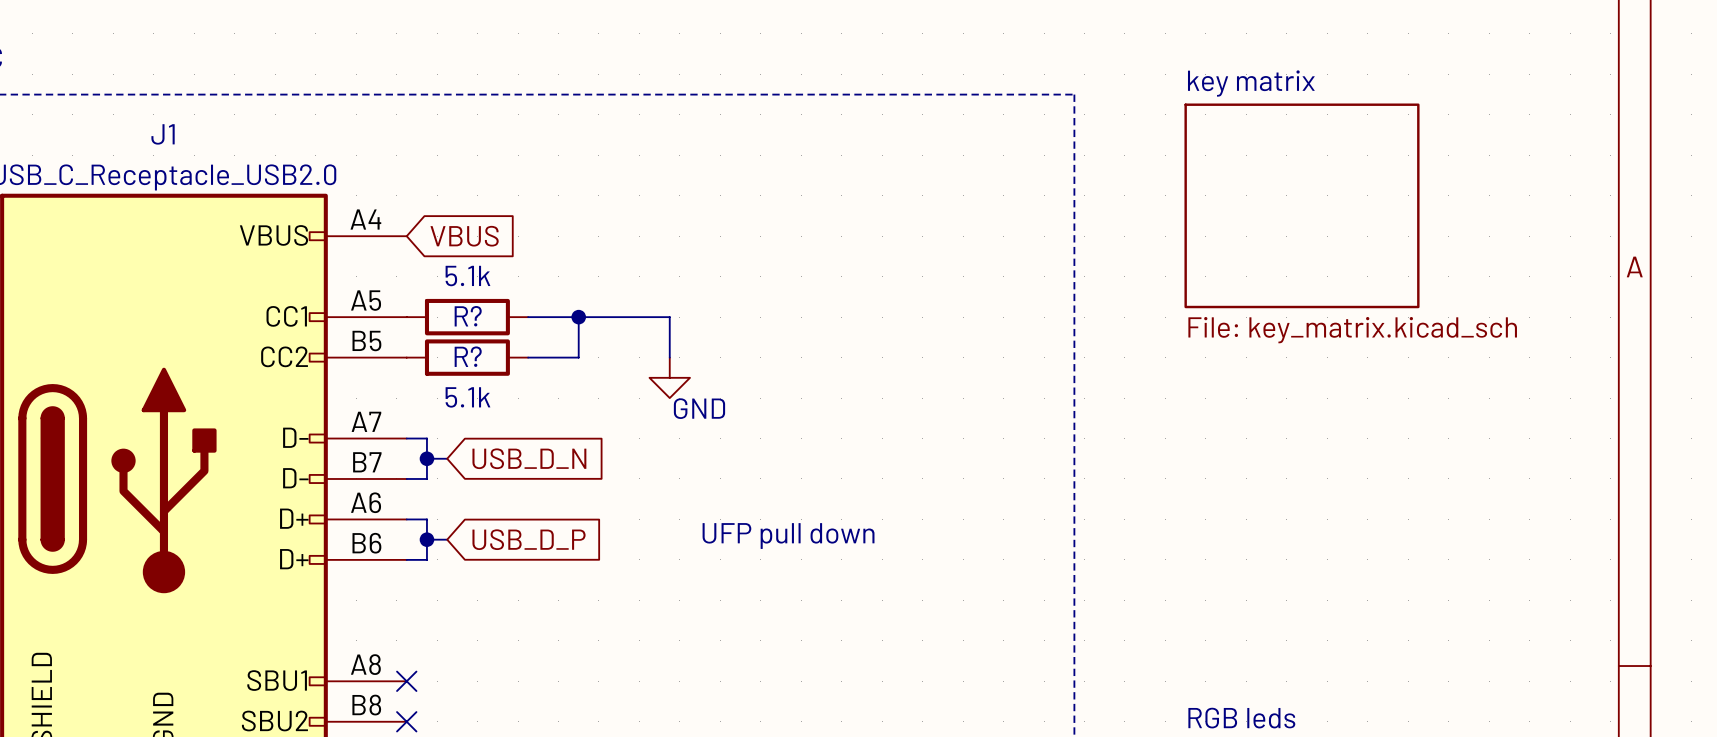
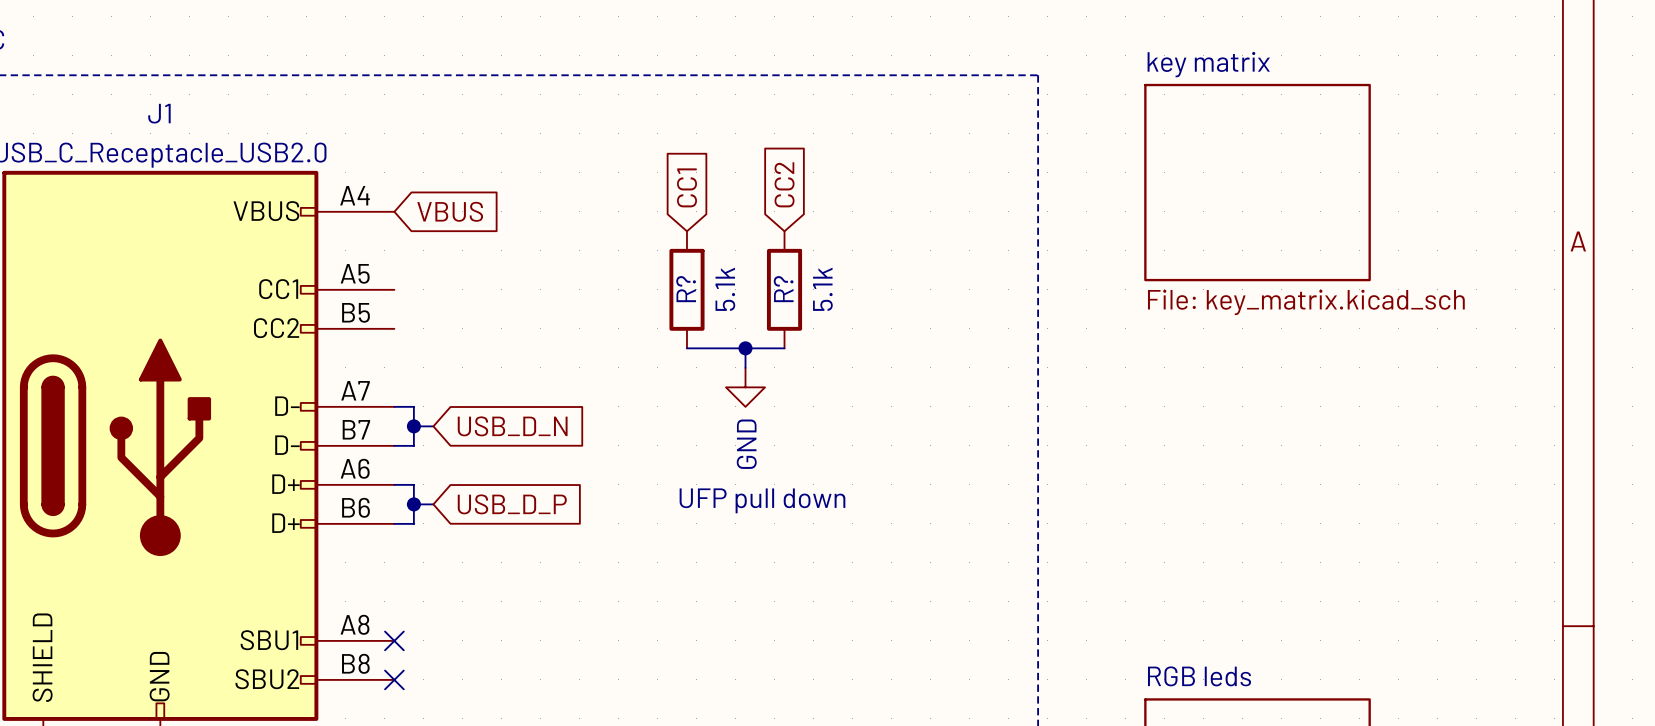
global label: none -> CC2 (784, 184)
global label: none -> CC1 (687, 187)
R?: 5.1k (467, 317) -> none
wire: (528, 317) (669, 317) (669, 357) -> none
wire: (578, 317) (578, 357) (528, 357) -> none
junction: (578, 317) -> none
R?: none -> 5.1k (686, 289)
R?: none -> 5.1k (784, 289)
R?: 5.1k (467, 357) -> none
power symbol position: GND (669, 377) -> GND (745, 387)
wire: none -> (686, 348) (784, 348)
wire: none -> (745, 348) (745, 367)
junction: none -> (745, 348)
power symbol text rotation: 0° (699, 408) -> 90° counterclockwise (746, 444)

